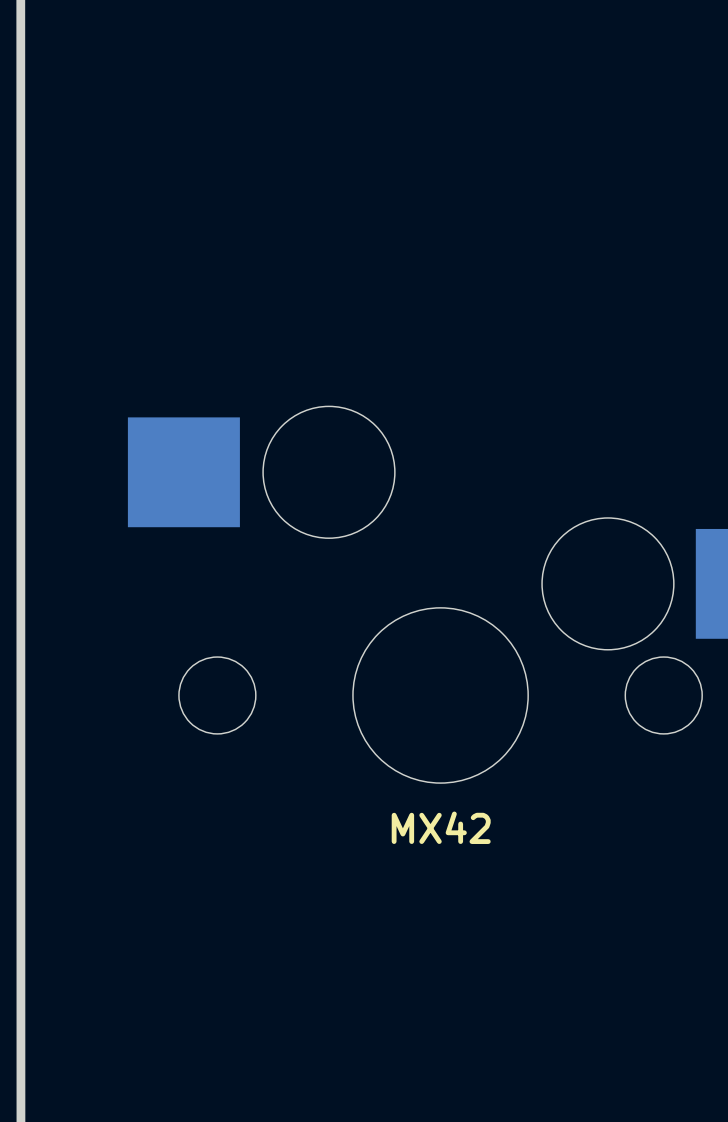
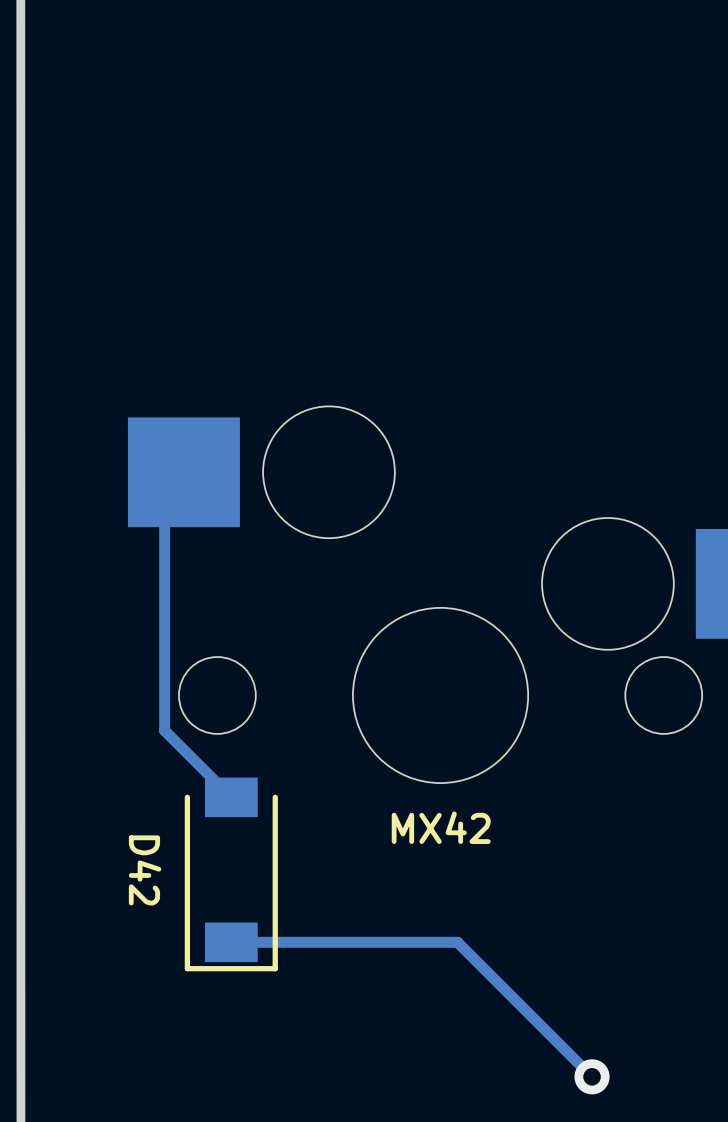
track: none -> (183, 472) (164, 491) (164, 730) (231, 797)
D42: none -> (231, 874)
track: none -> (231, 942) (457, 942) (592, 1076)
via: none -> (592, 1076)

